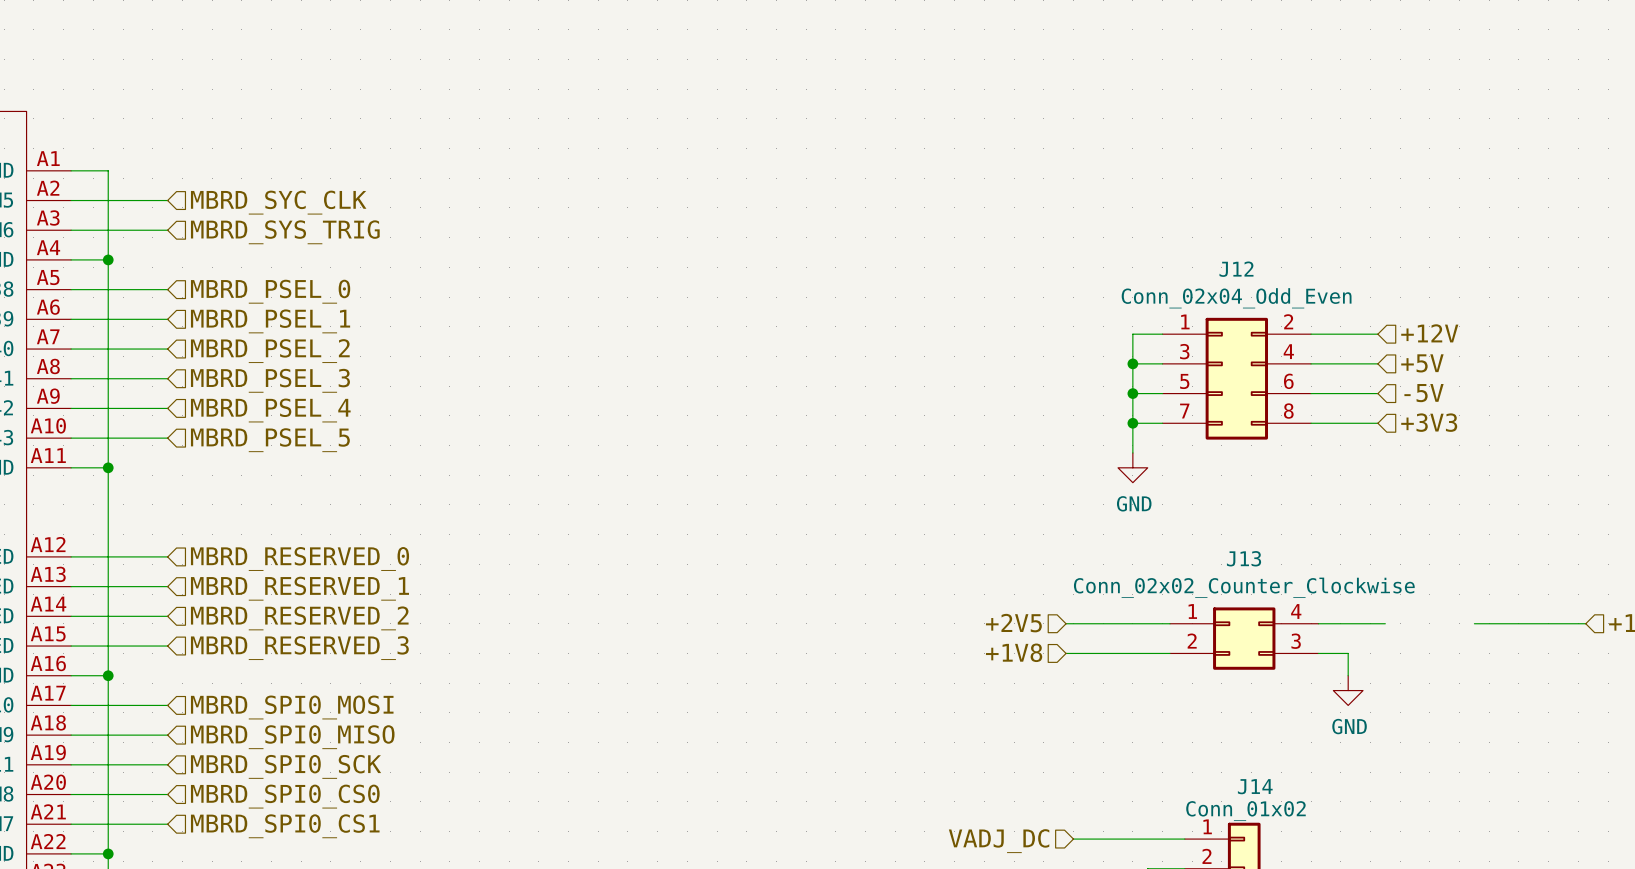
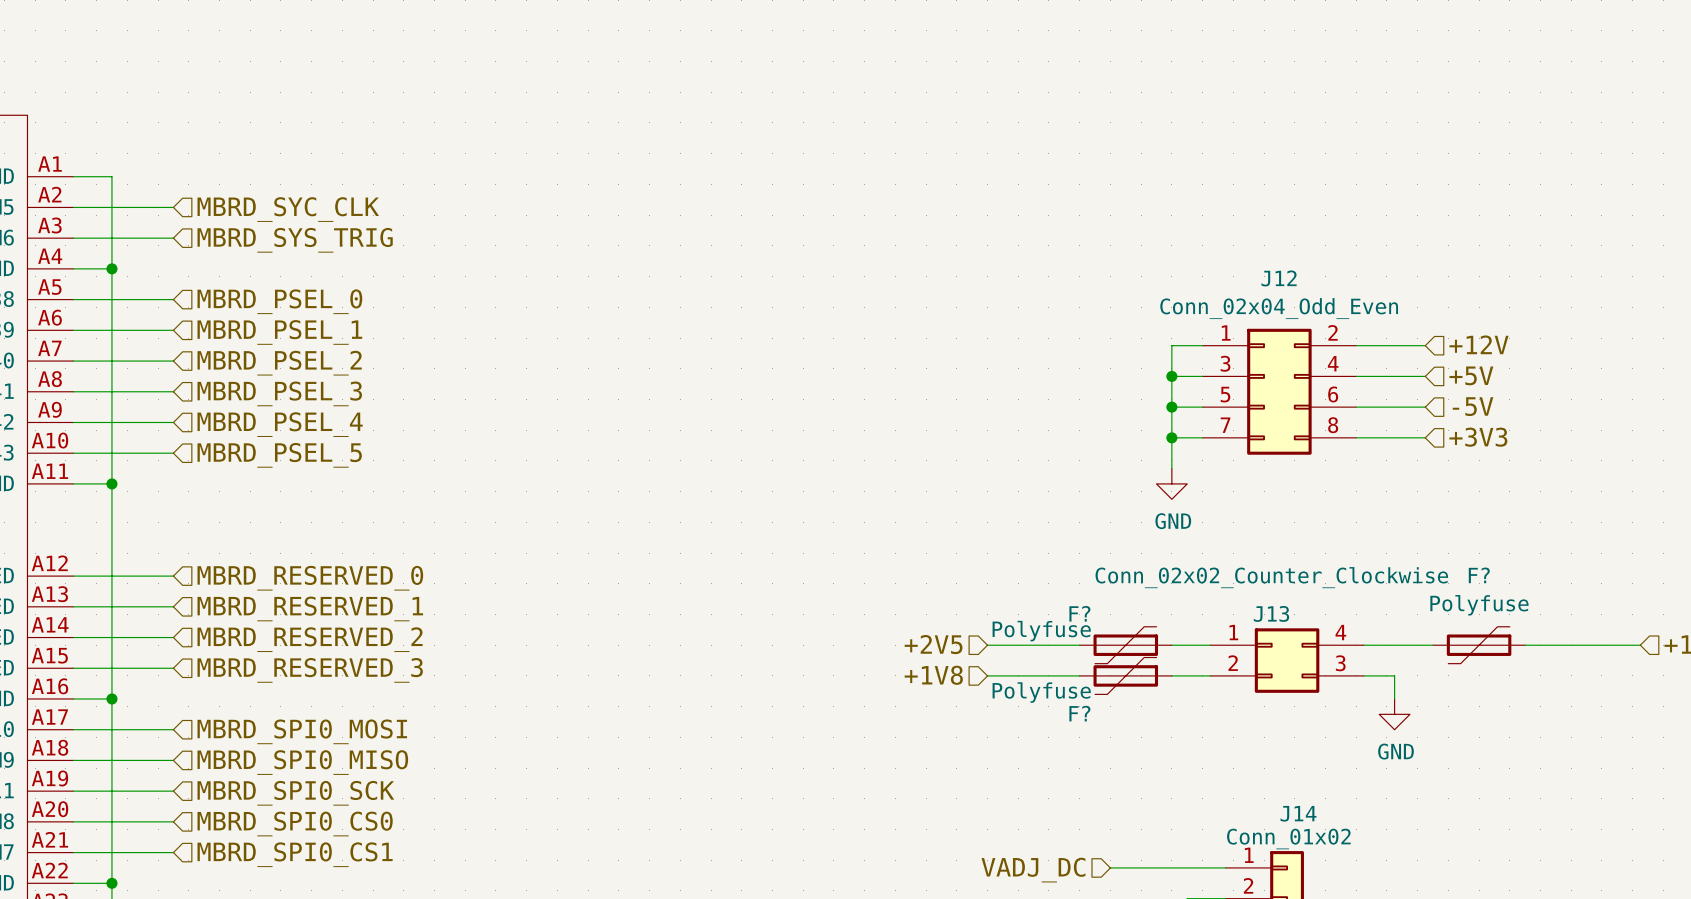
J13 name position: J13 (1244, 558) -> J13 (1271, 613)
J13 value position: Conn_02x02_Counter_Clockwise (1244, 587) -> Conn_02x02_Counter_Clockwise (1271, 577)
wire: none -> (987, 645) (1079, 645)
hierarchical label position: +2V5 (1013, 623) -> +2V5 (933, 644)
F?: none -> Polyfuse (1125, 645)
F?: none -> Polyfuse (1479, 645)
hierarchical label position: +1V8 (1014, 652) -> +1V8 (933, 675)
wire: none -> (987, 675) (1079, 675)
F?: none -> Polyfuse (1125, 675)

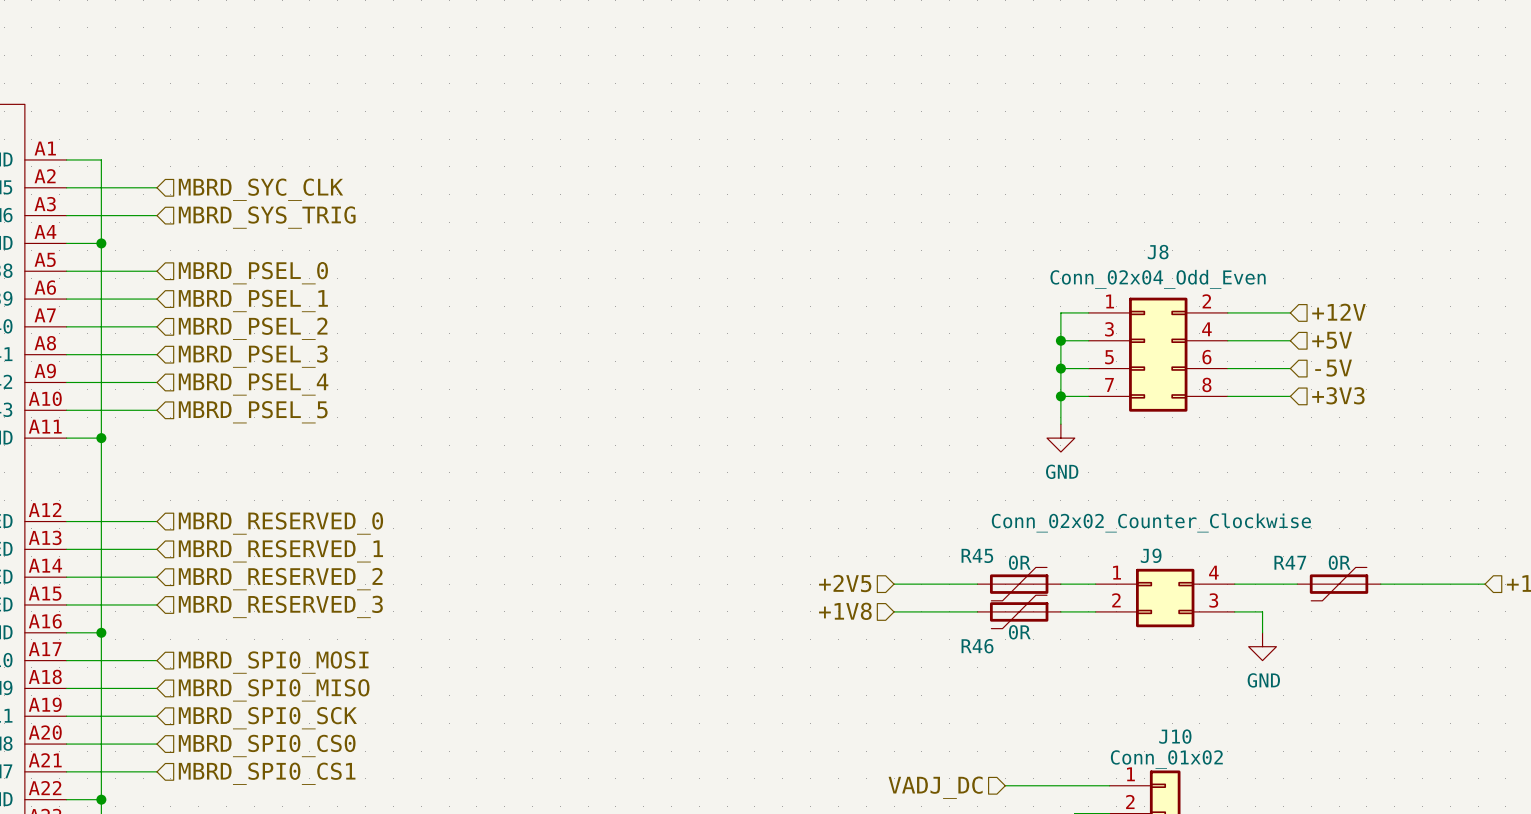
J12 name: J12 (1279, 278) -> J8 (1158, 252)
F? name: F? (1479, 575) -> R47 (1290, 562)
F? value: Polyfuse (1479, 605) -> 0R (1339, 562)
F? name: F? (1079, 613) -> R45 (977, 555)
J13 name: J13 (1271, 613) -> J9 (1151, 555)
F? value: Polyfuse (1041, 631) -> 0R (1019, 562)
F? value: Polyfuse (1041, 692) -> 0R (1019, 632)
F? name: F? (1079, 713) -> R46 (977, 646)
J14 name: J14 (1298, 813) -> J10 (1175, 736)

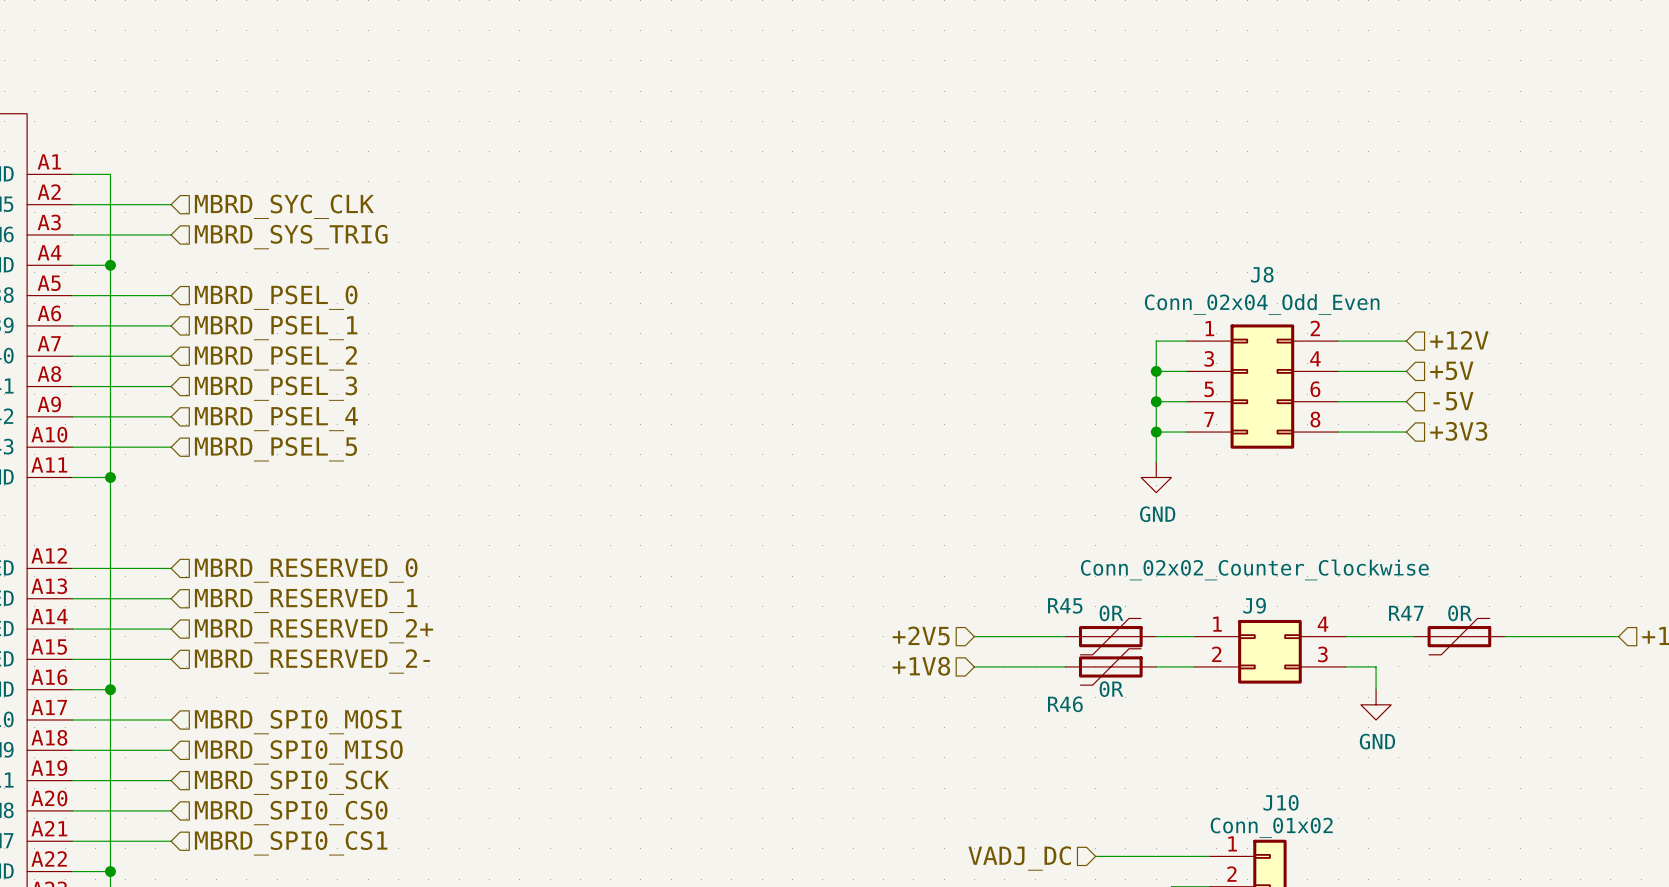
hierarchical label: MBRD_RESERVED_2 (280, 579) -> MBRD_RESERVED_2+ (313, 631)
hierarchical label: MBRD_RESERVED_3 (280, 606) -> MBRD_RESERVED_2- (312, 661)

